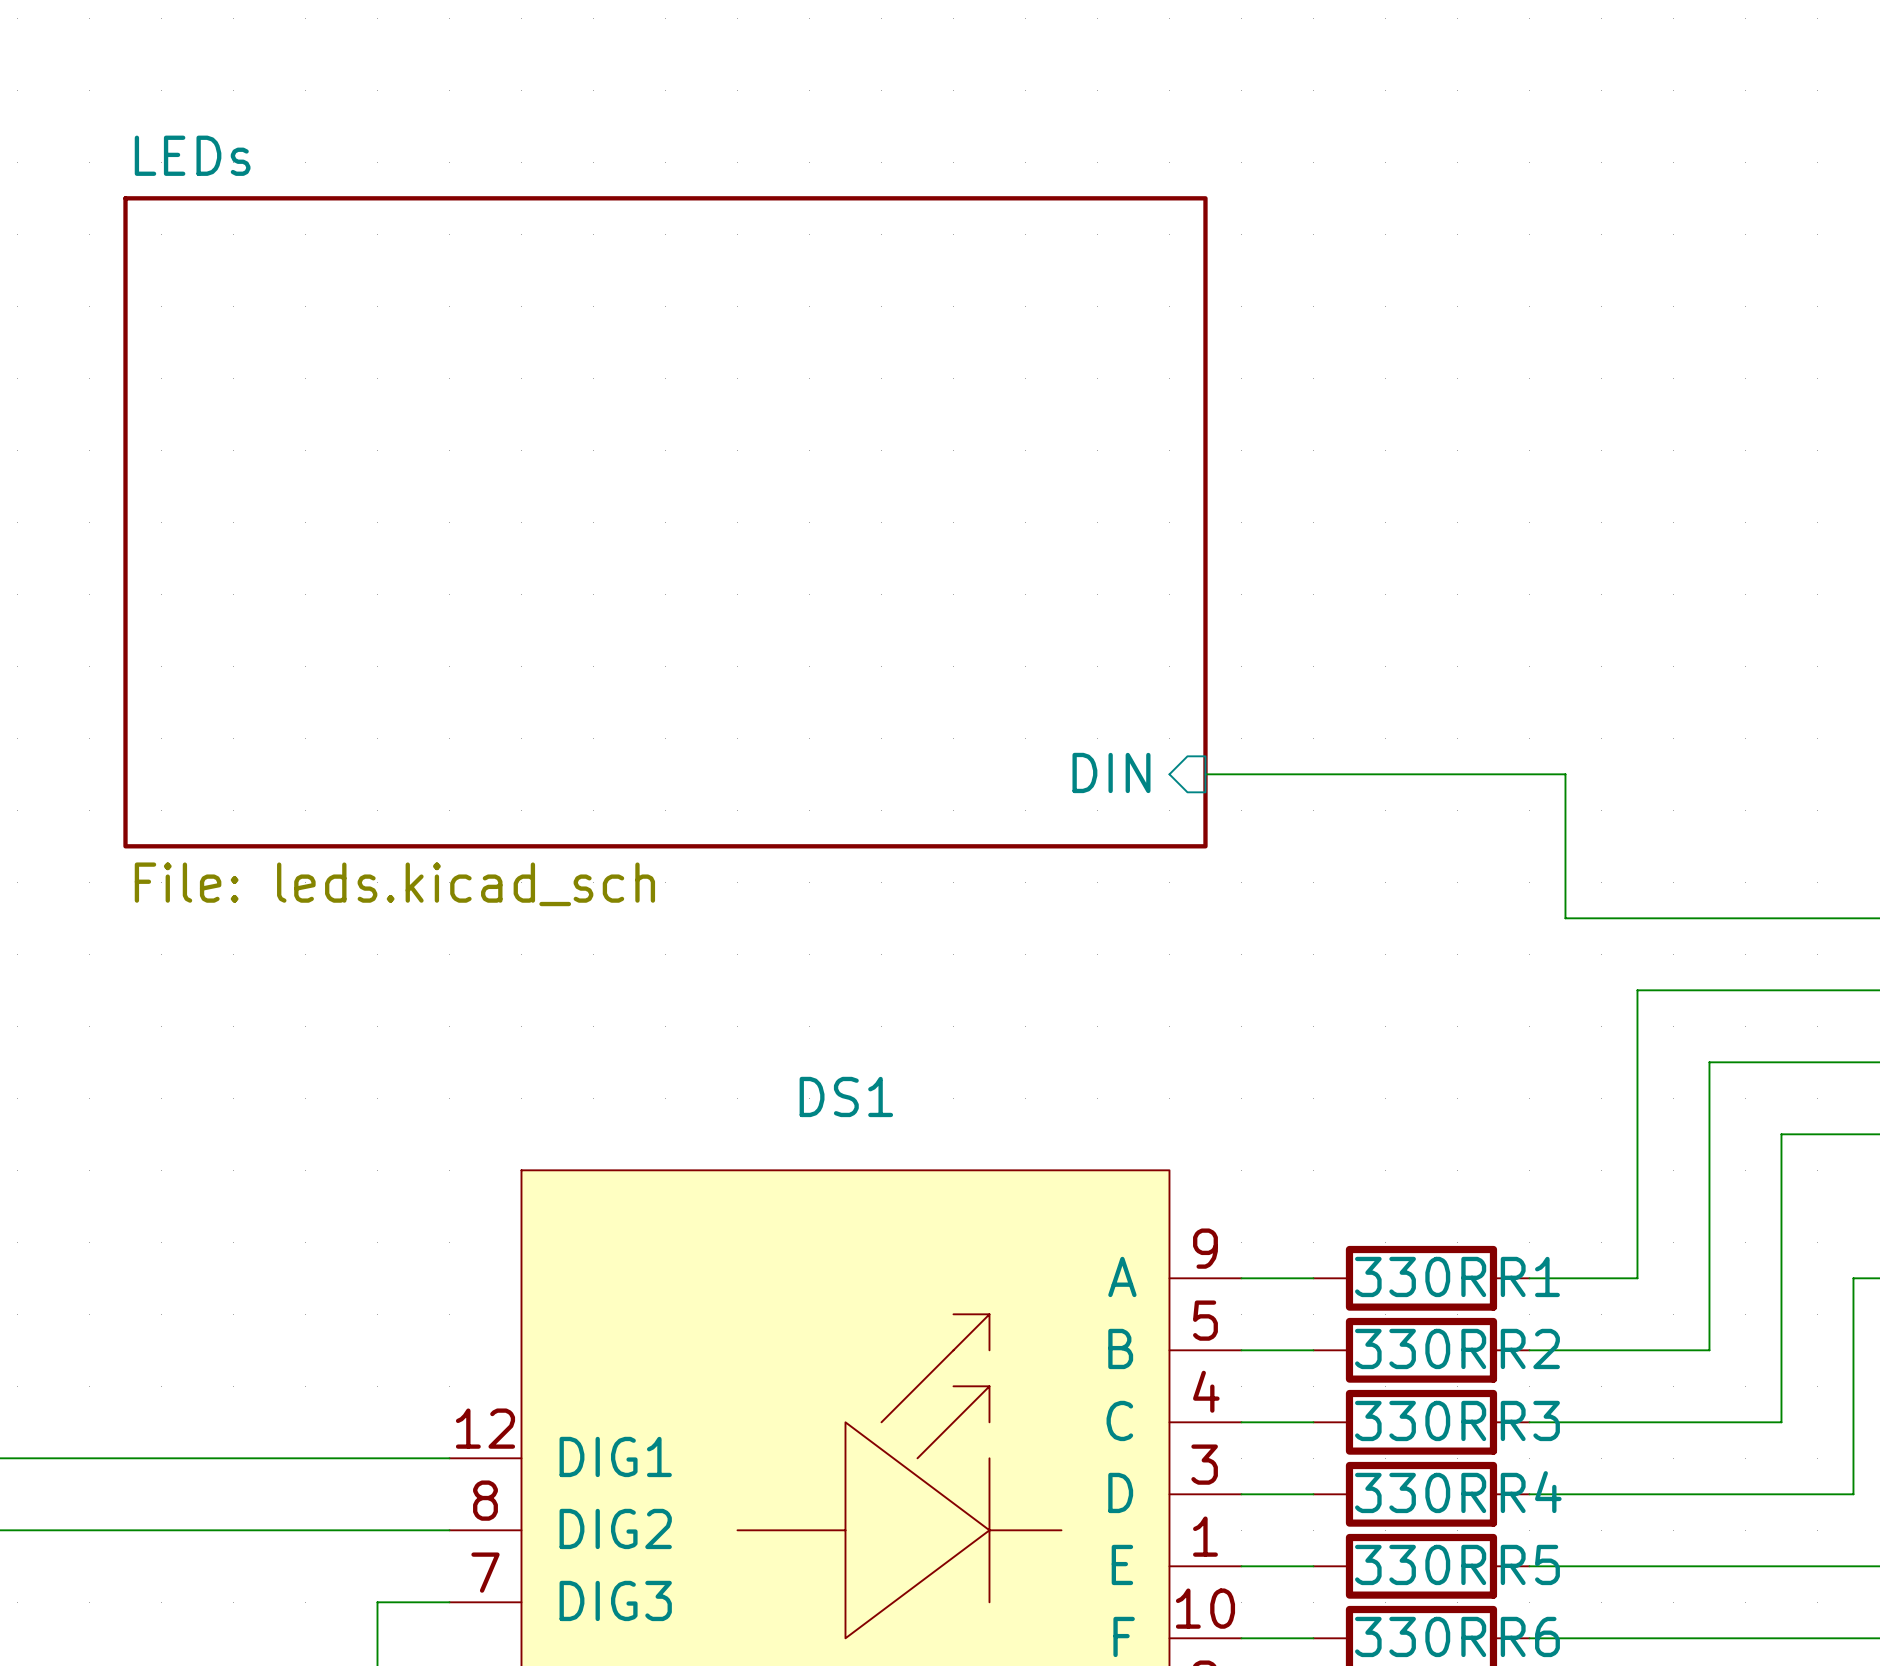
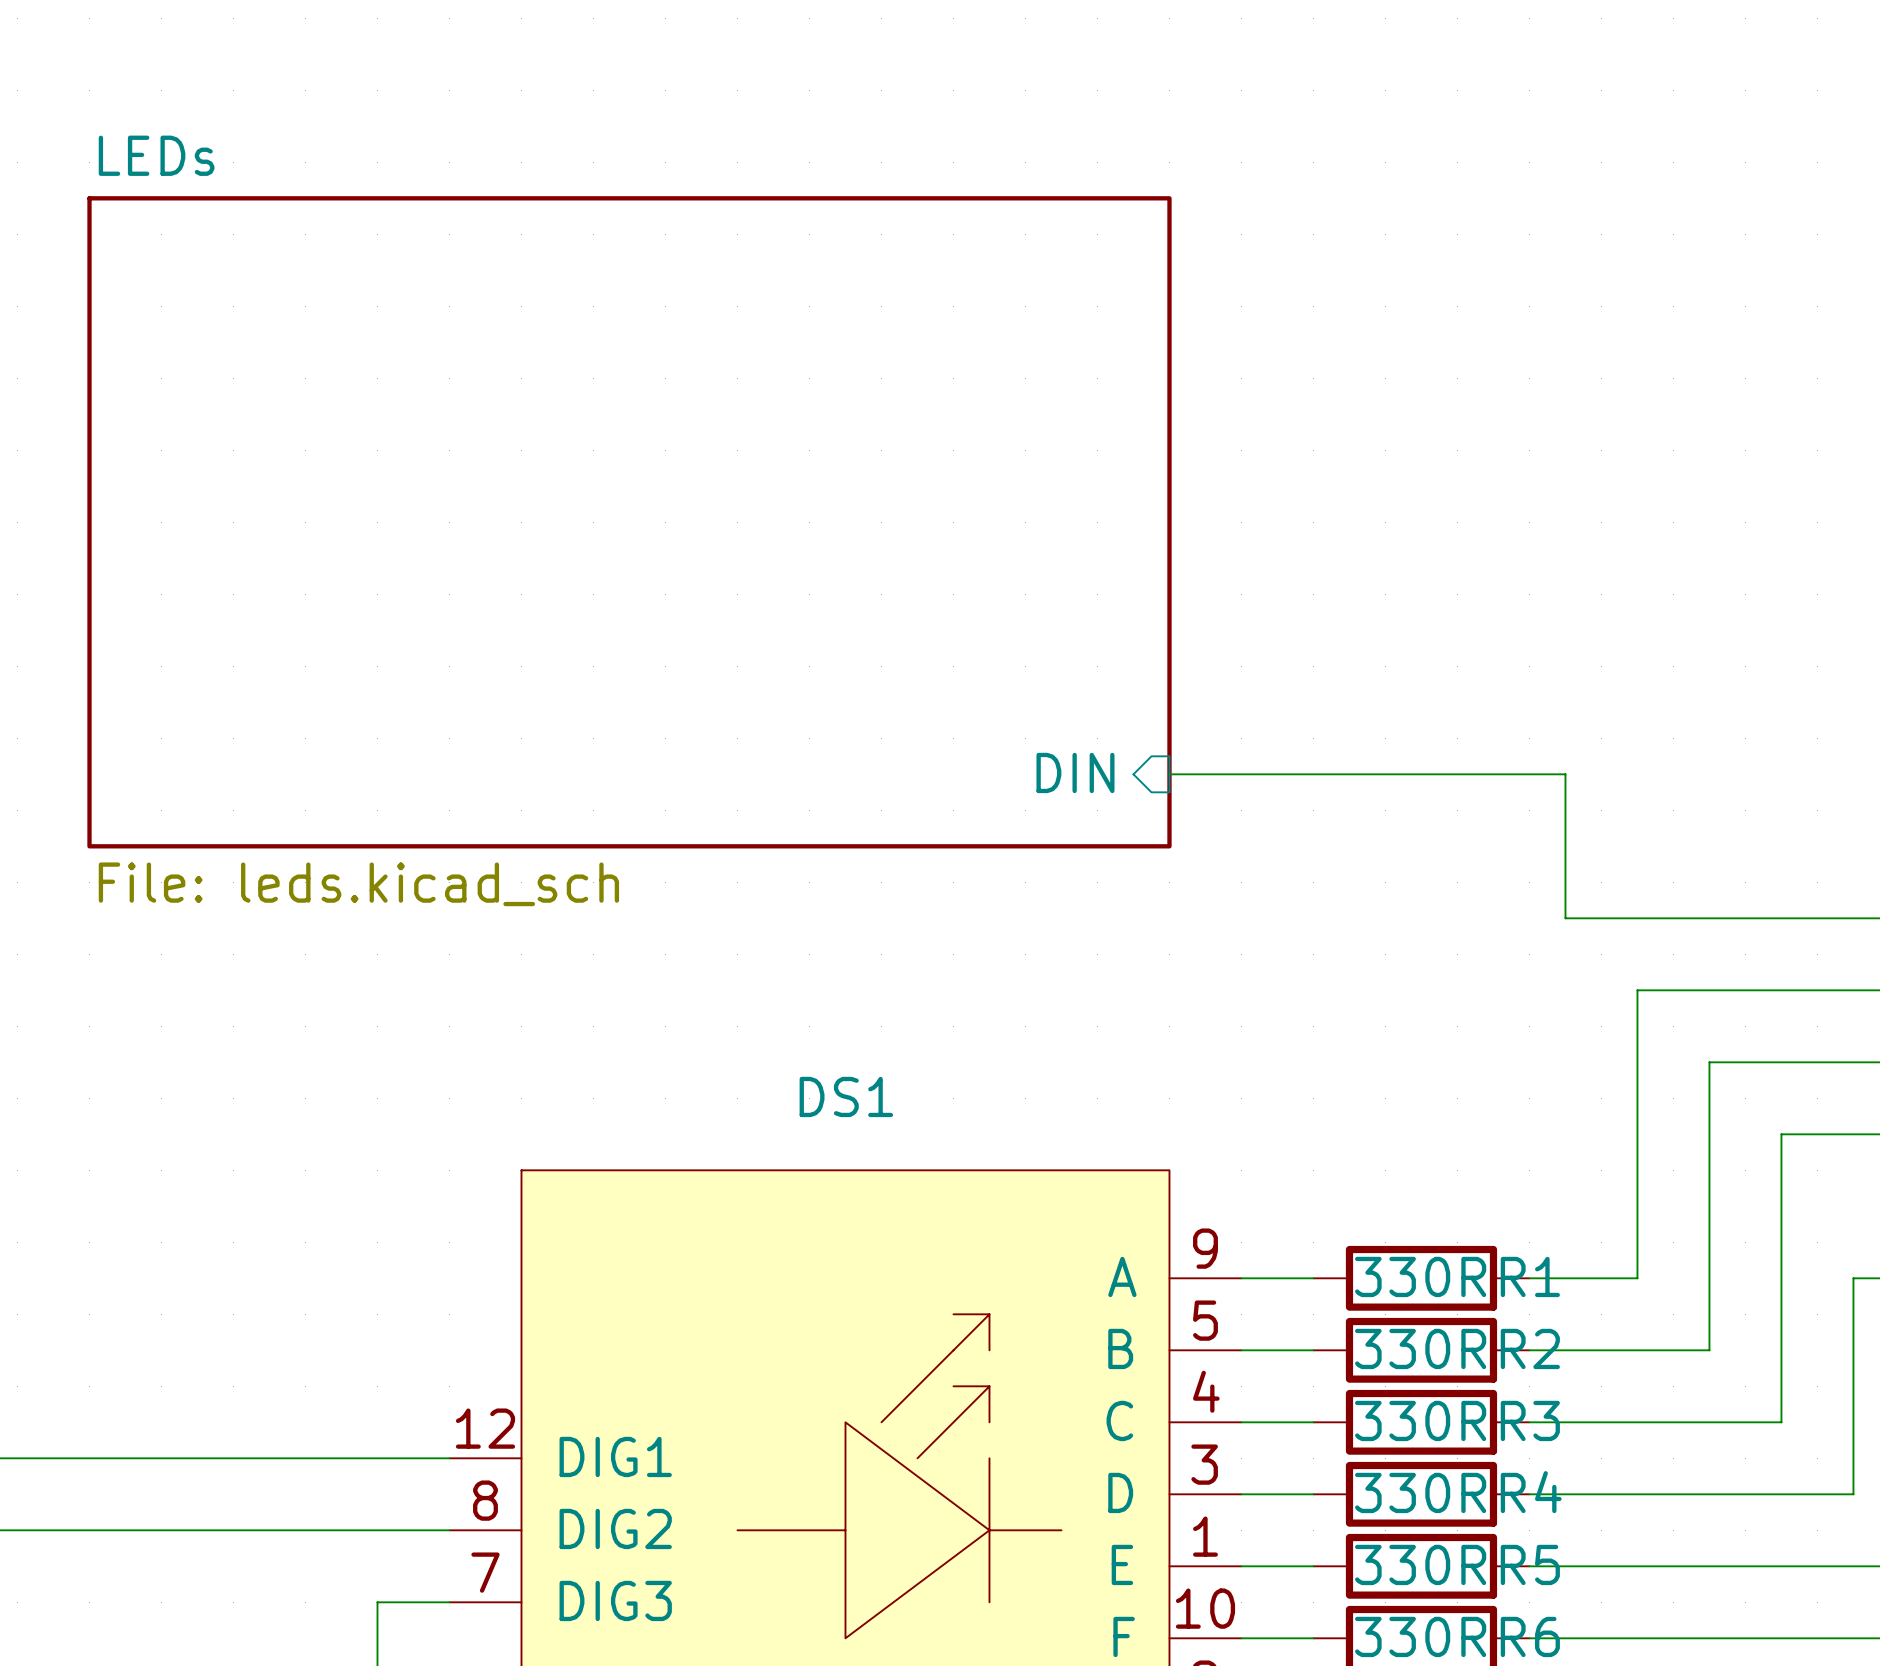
sheet LEDs position: (665, 522) -> (629, 522)
sheet pin position: DIN (1111, 772) -> DIN (1075, 772)
wire: none -> (1169, 774) (1205, 774)

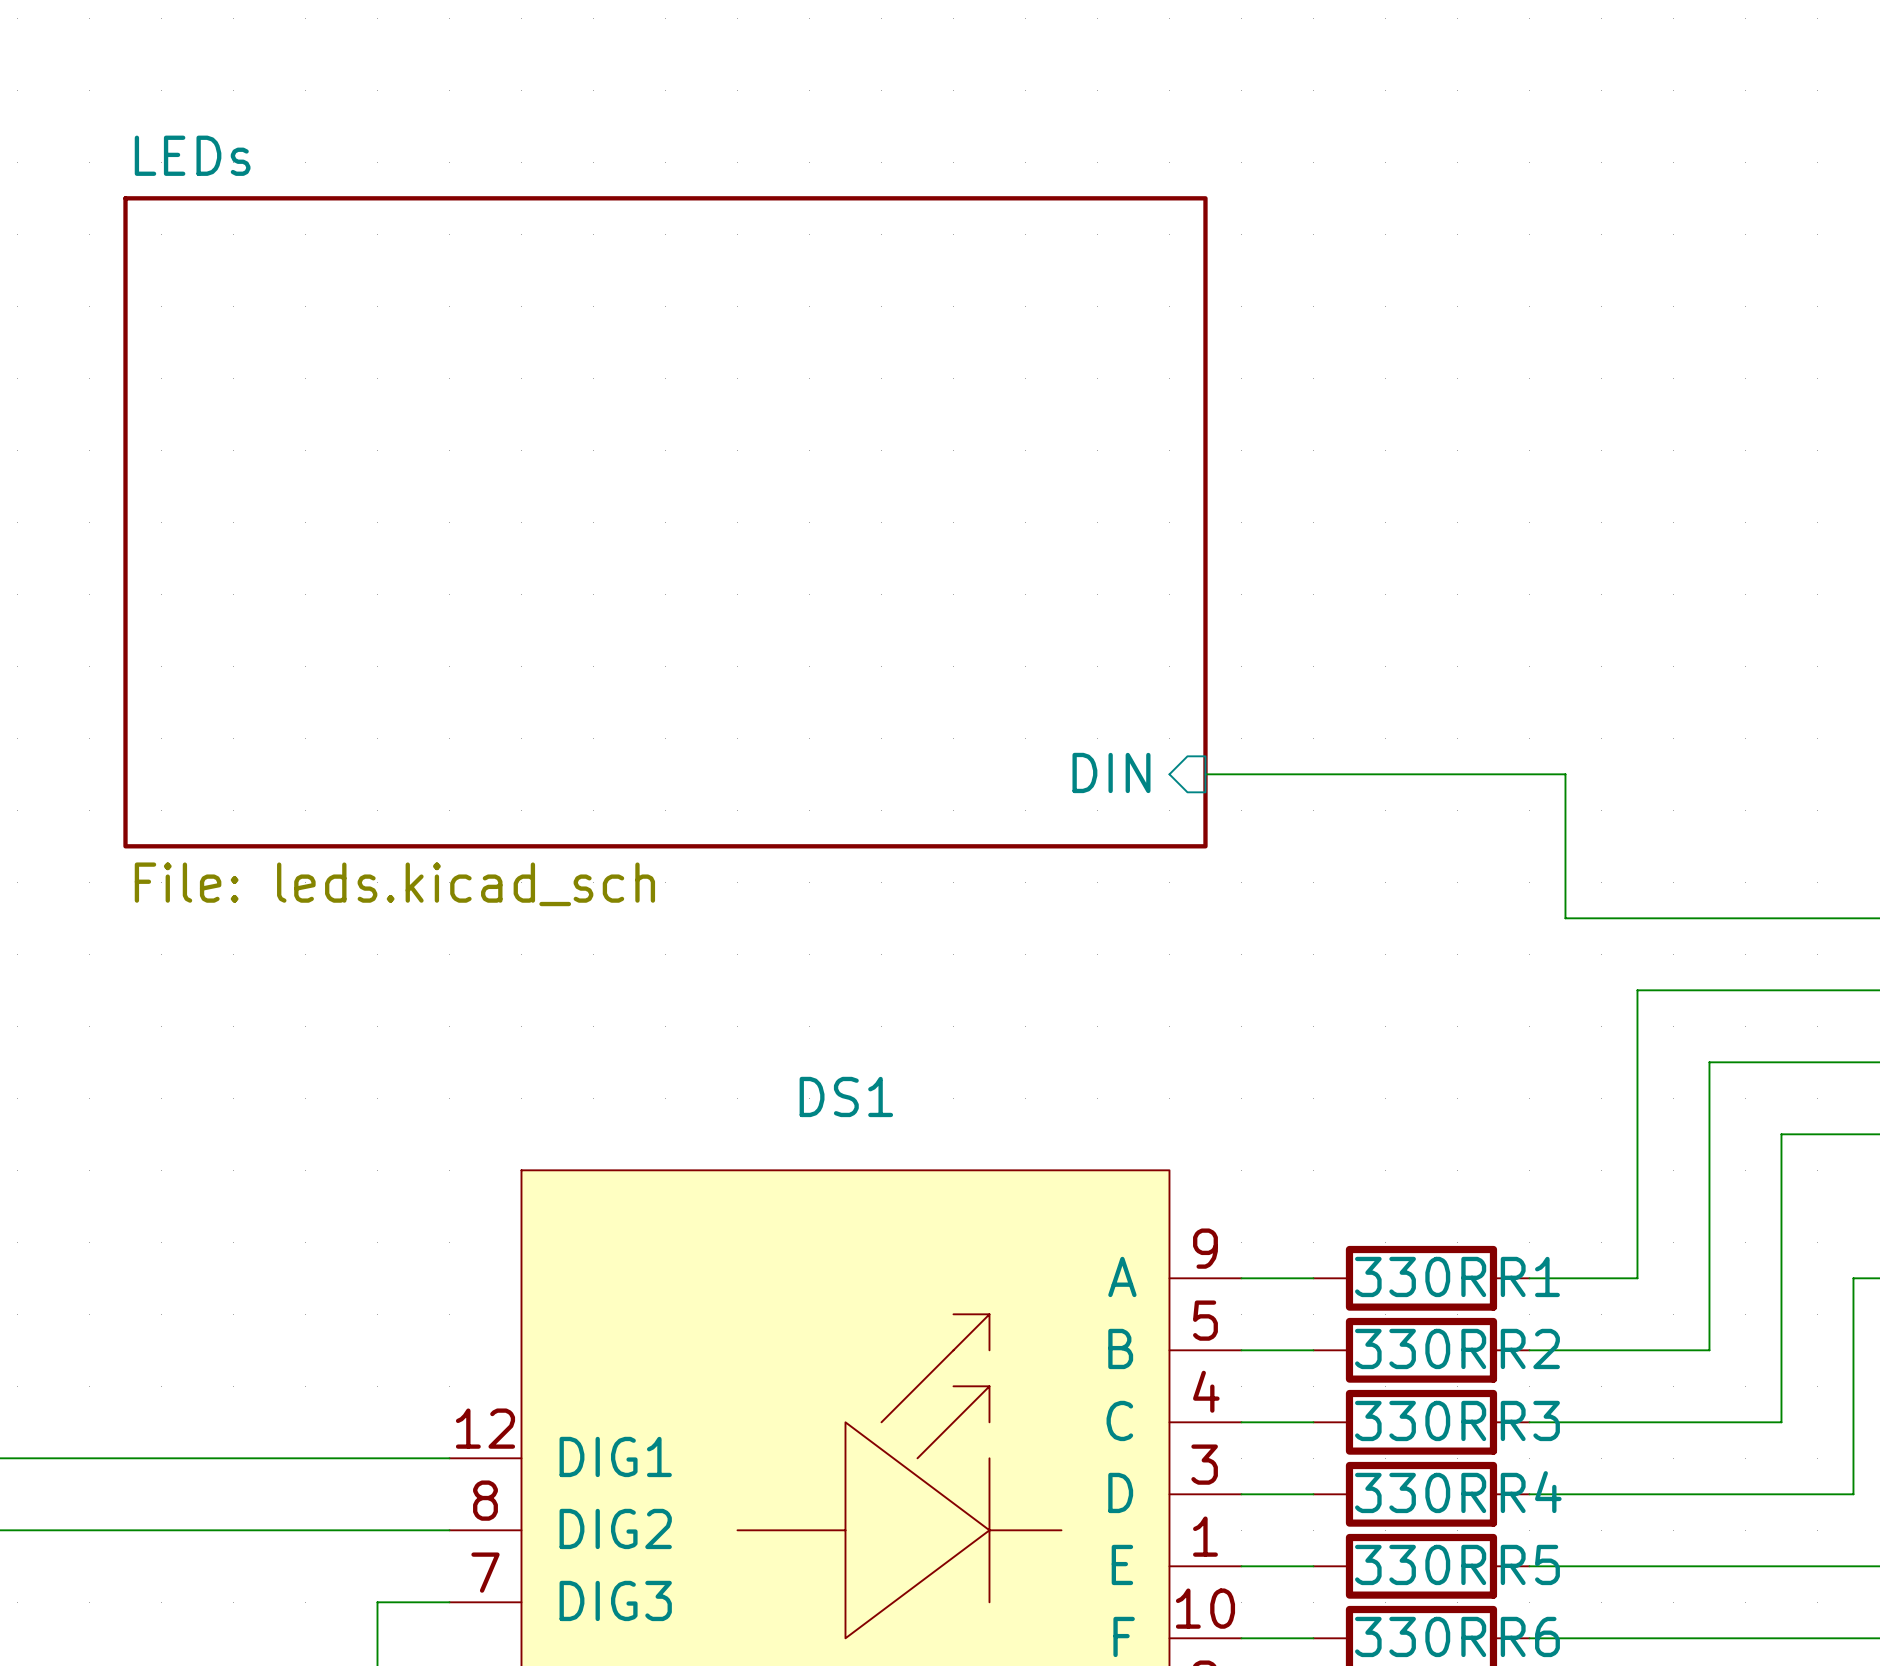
sheet LEDs position: (629, 522) -> (665, 522)
sheet pin position: DIN (1075, 772) -> DIN (1111, 772)
wire: (1169, 774) (1205, 774) -> none

